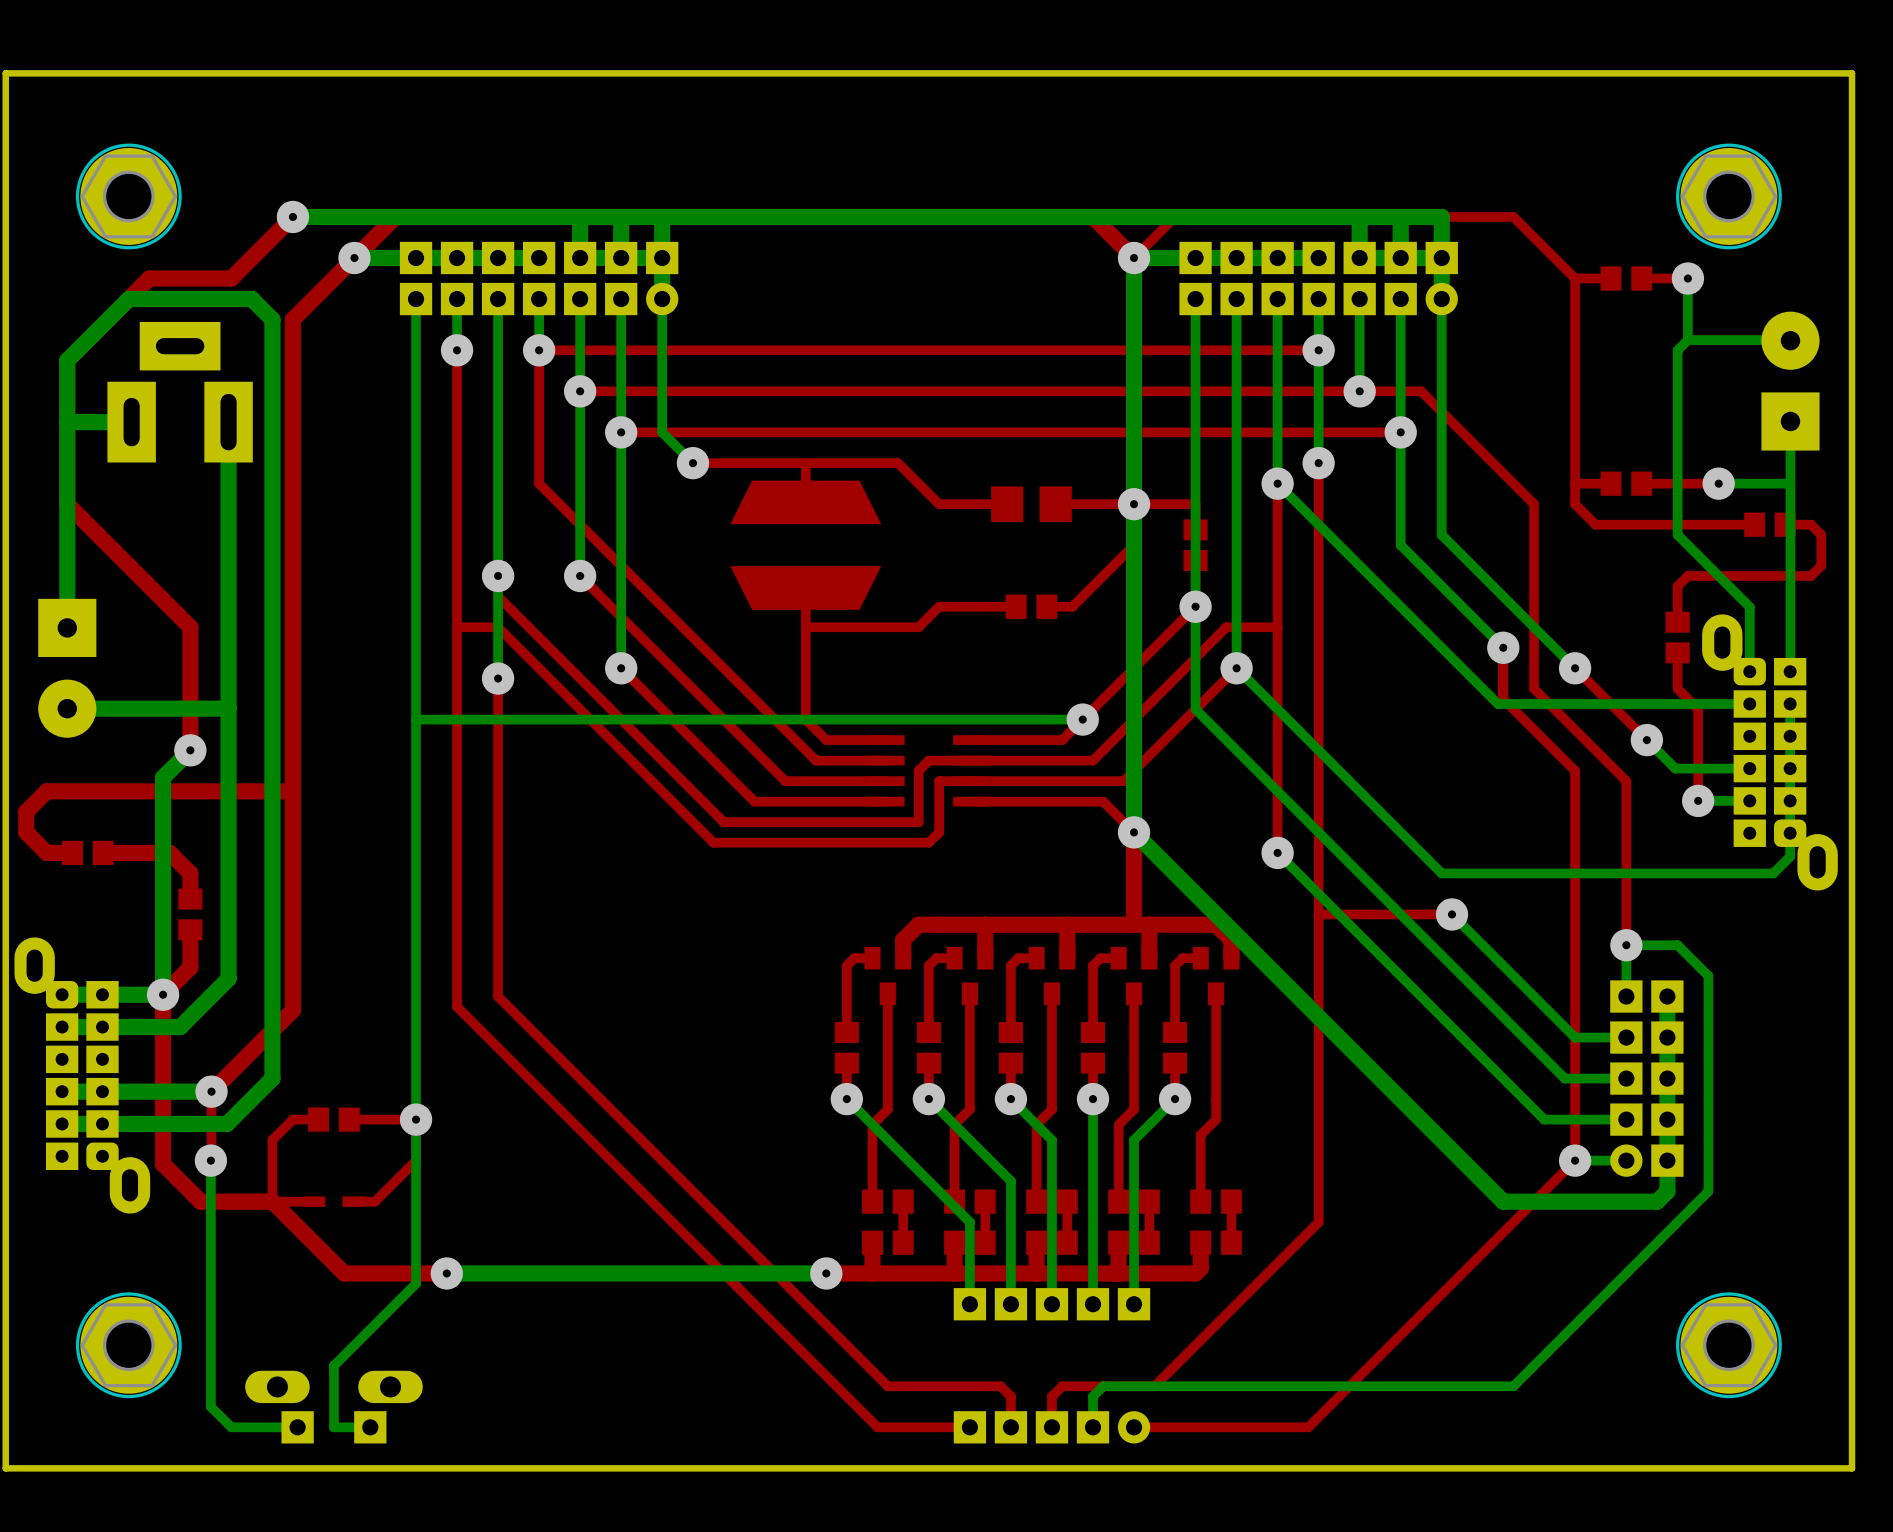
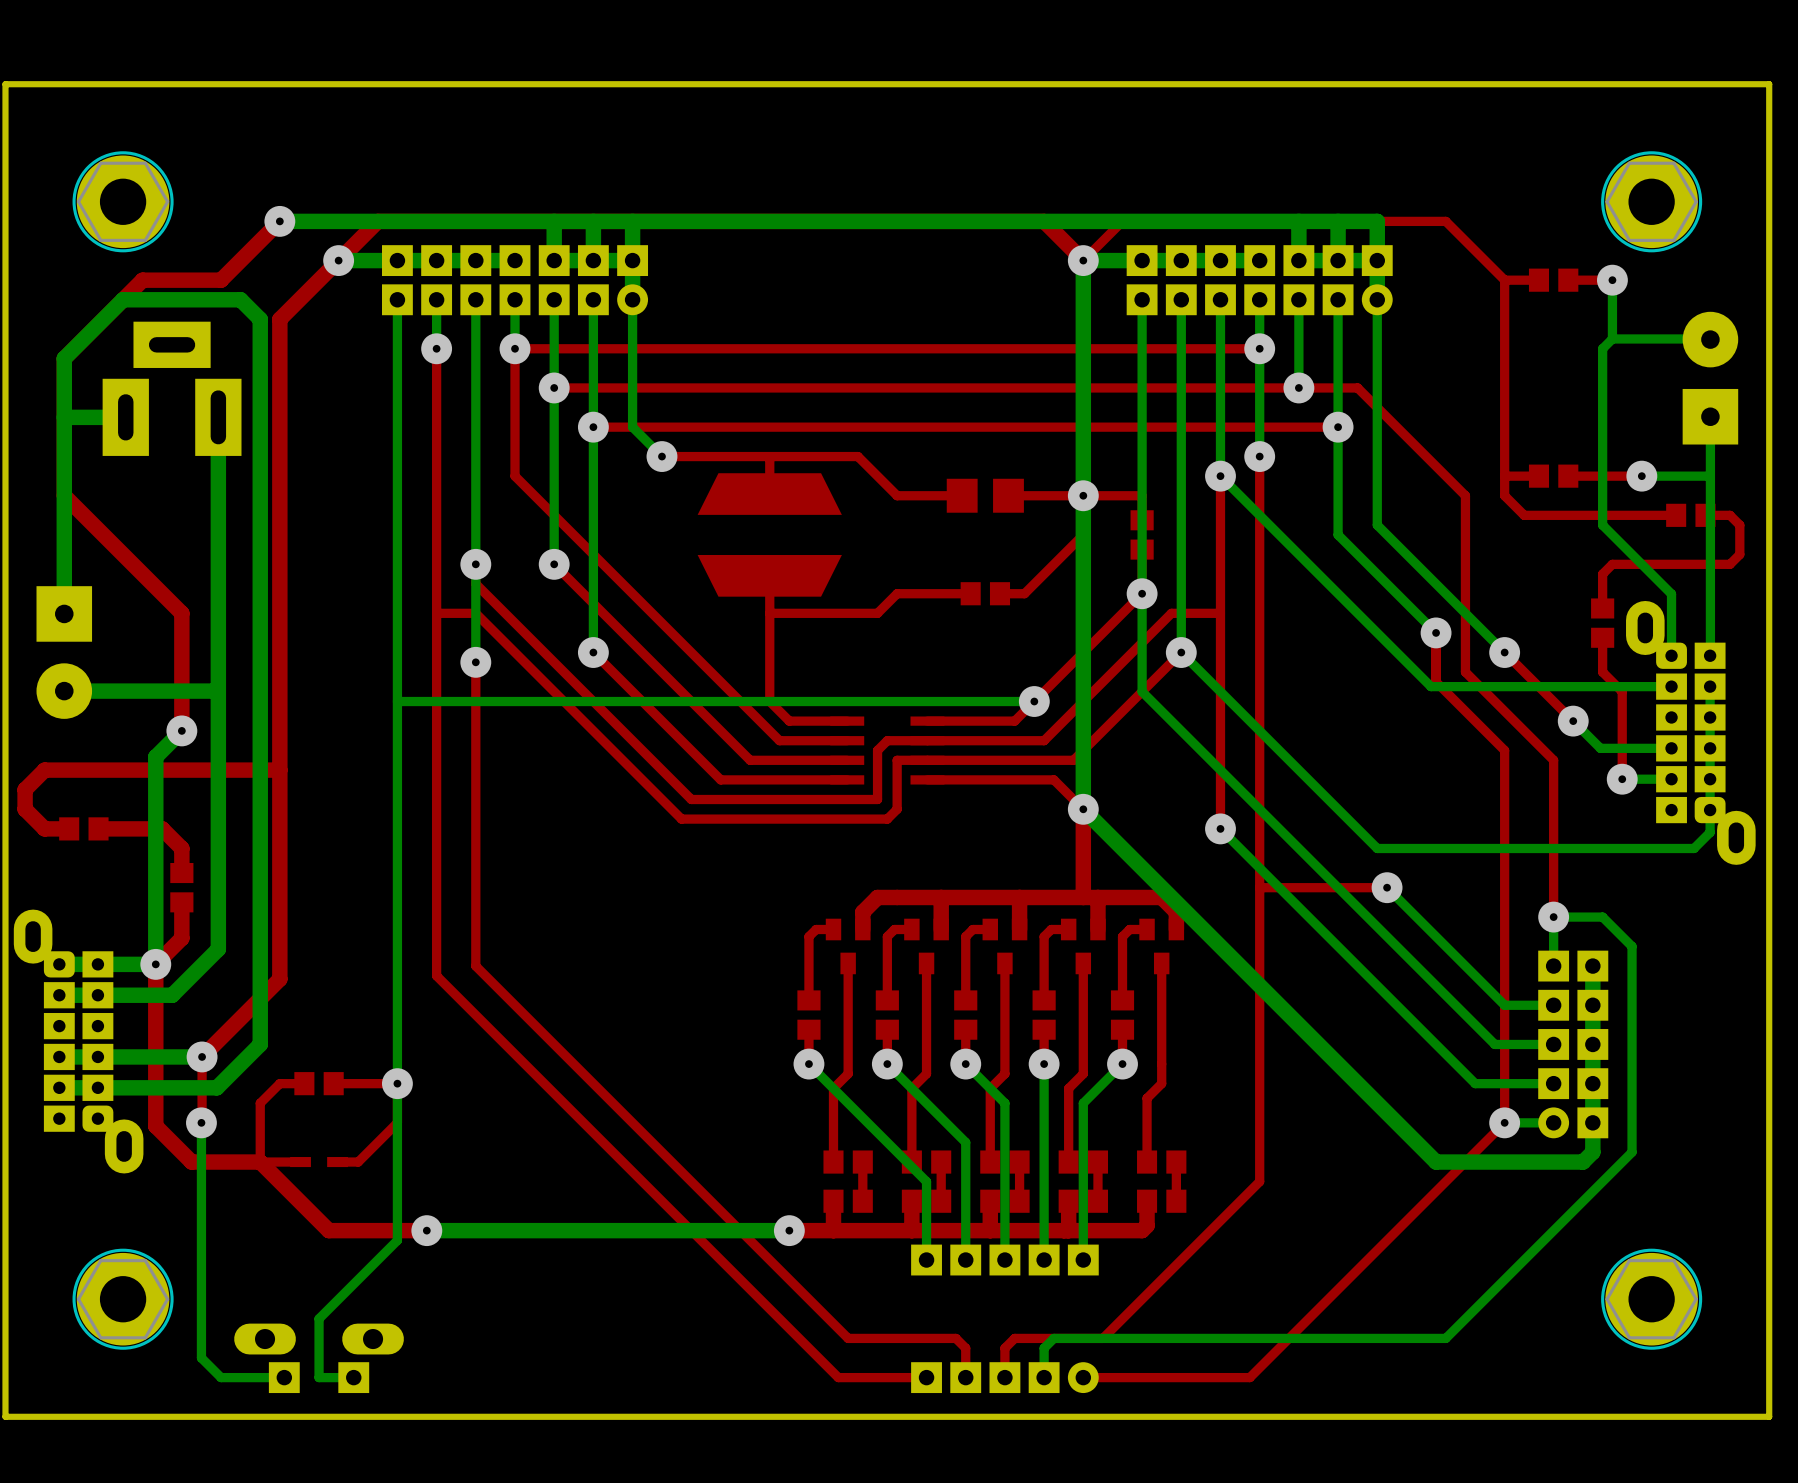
part footprint: [75, 143, 182, 250] -> [72, 151, 174, 253]
part footprint: [1676, 143, 1782, 250] -> [1601, 151, 1703, 253]
part footprint: [75, 1292, 182, 1399] -> [72, 1248, 174, 1350]
part footprint: [1676, 1292, 1782, 1399] -> [1601, 1248, 1703, 1350]

